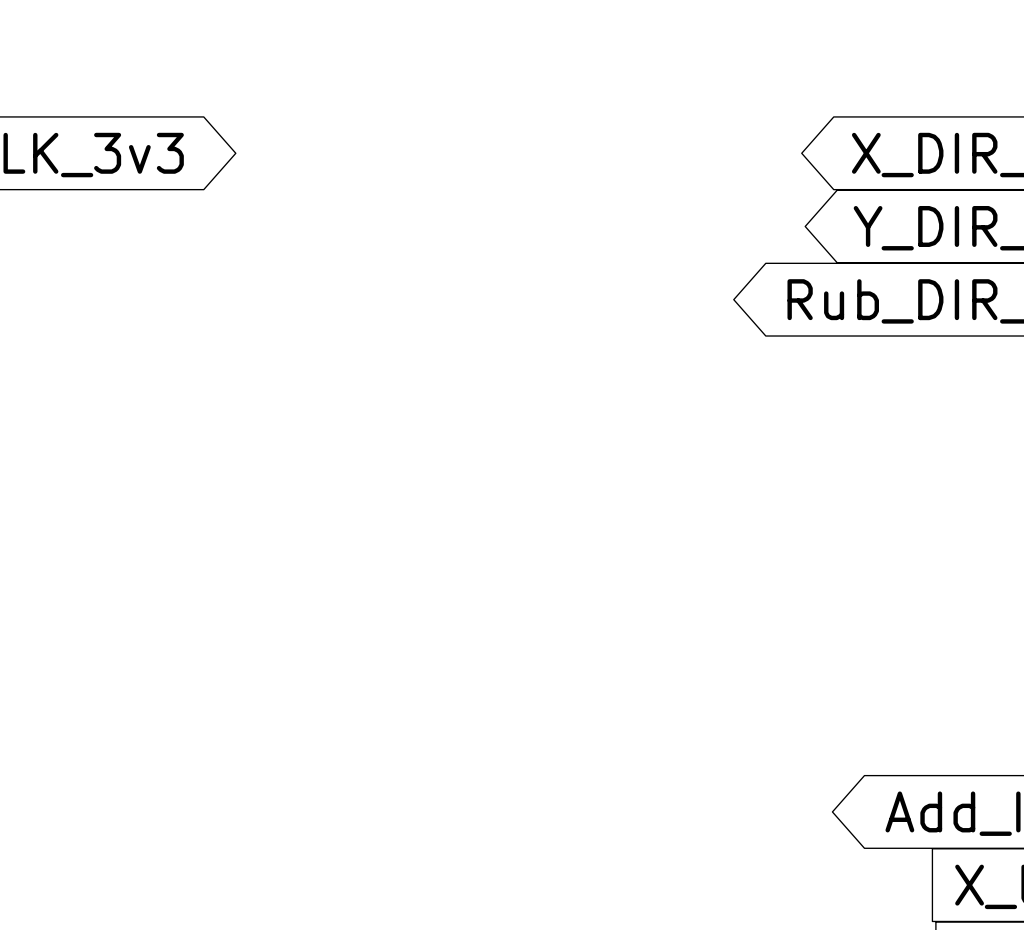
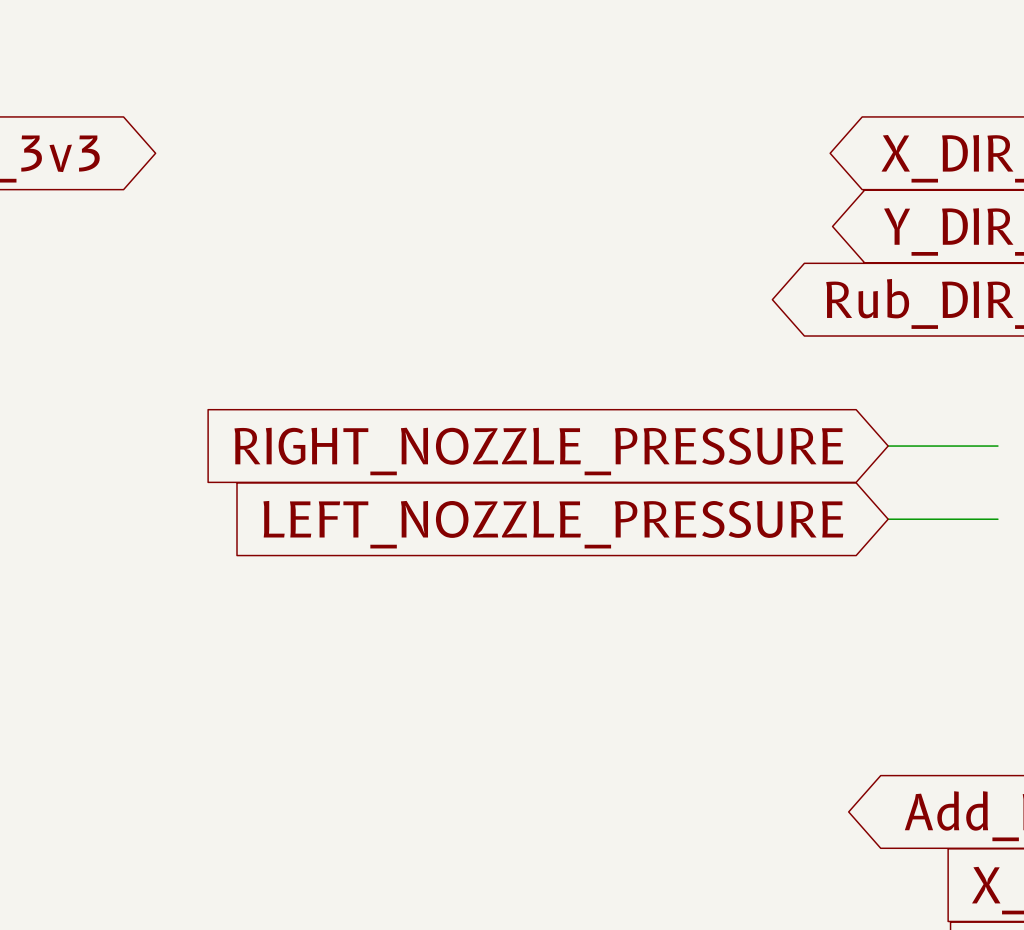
wire: none -> (888, 446) (997, 446)
global label: none -> RIGHT_NOZZLE_PRESSURE (538, 451)
wire: none -> (888, 519) (997, 519)
global label: none -> LEFT_NOZZLE_PRESSURE (553, 524)

